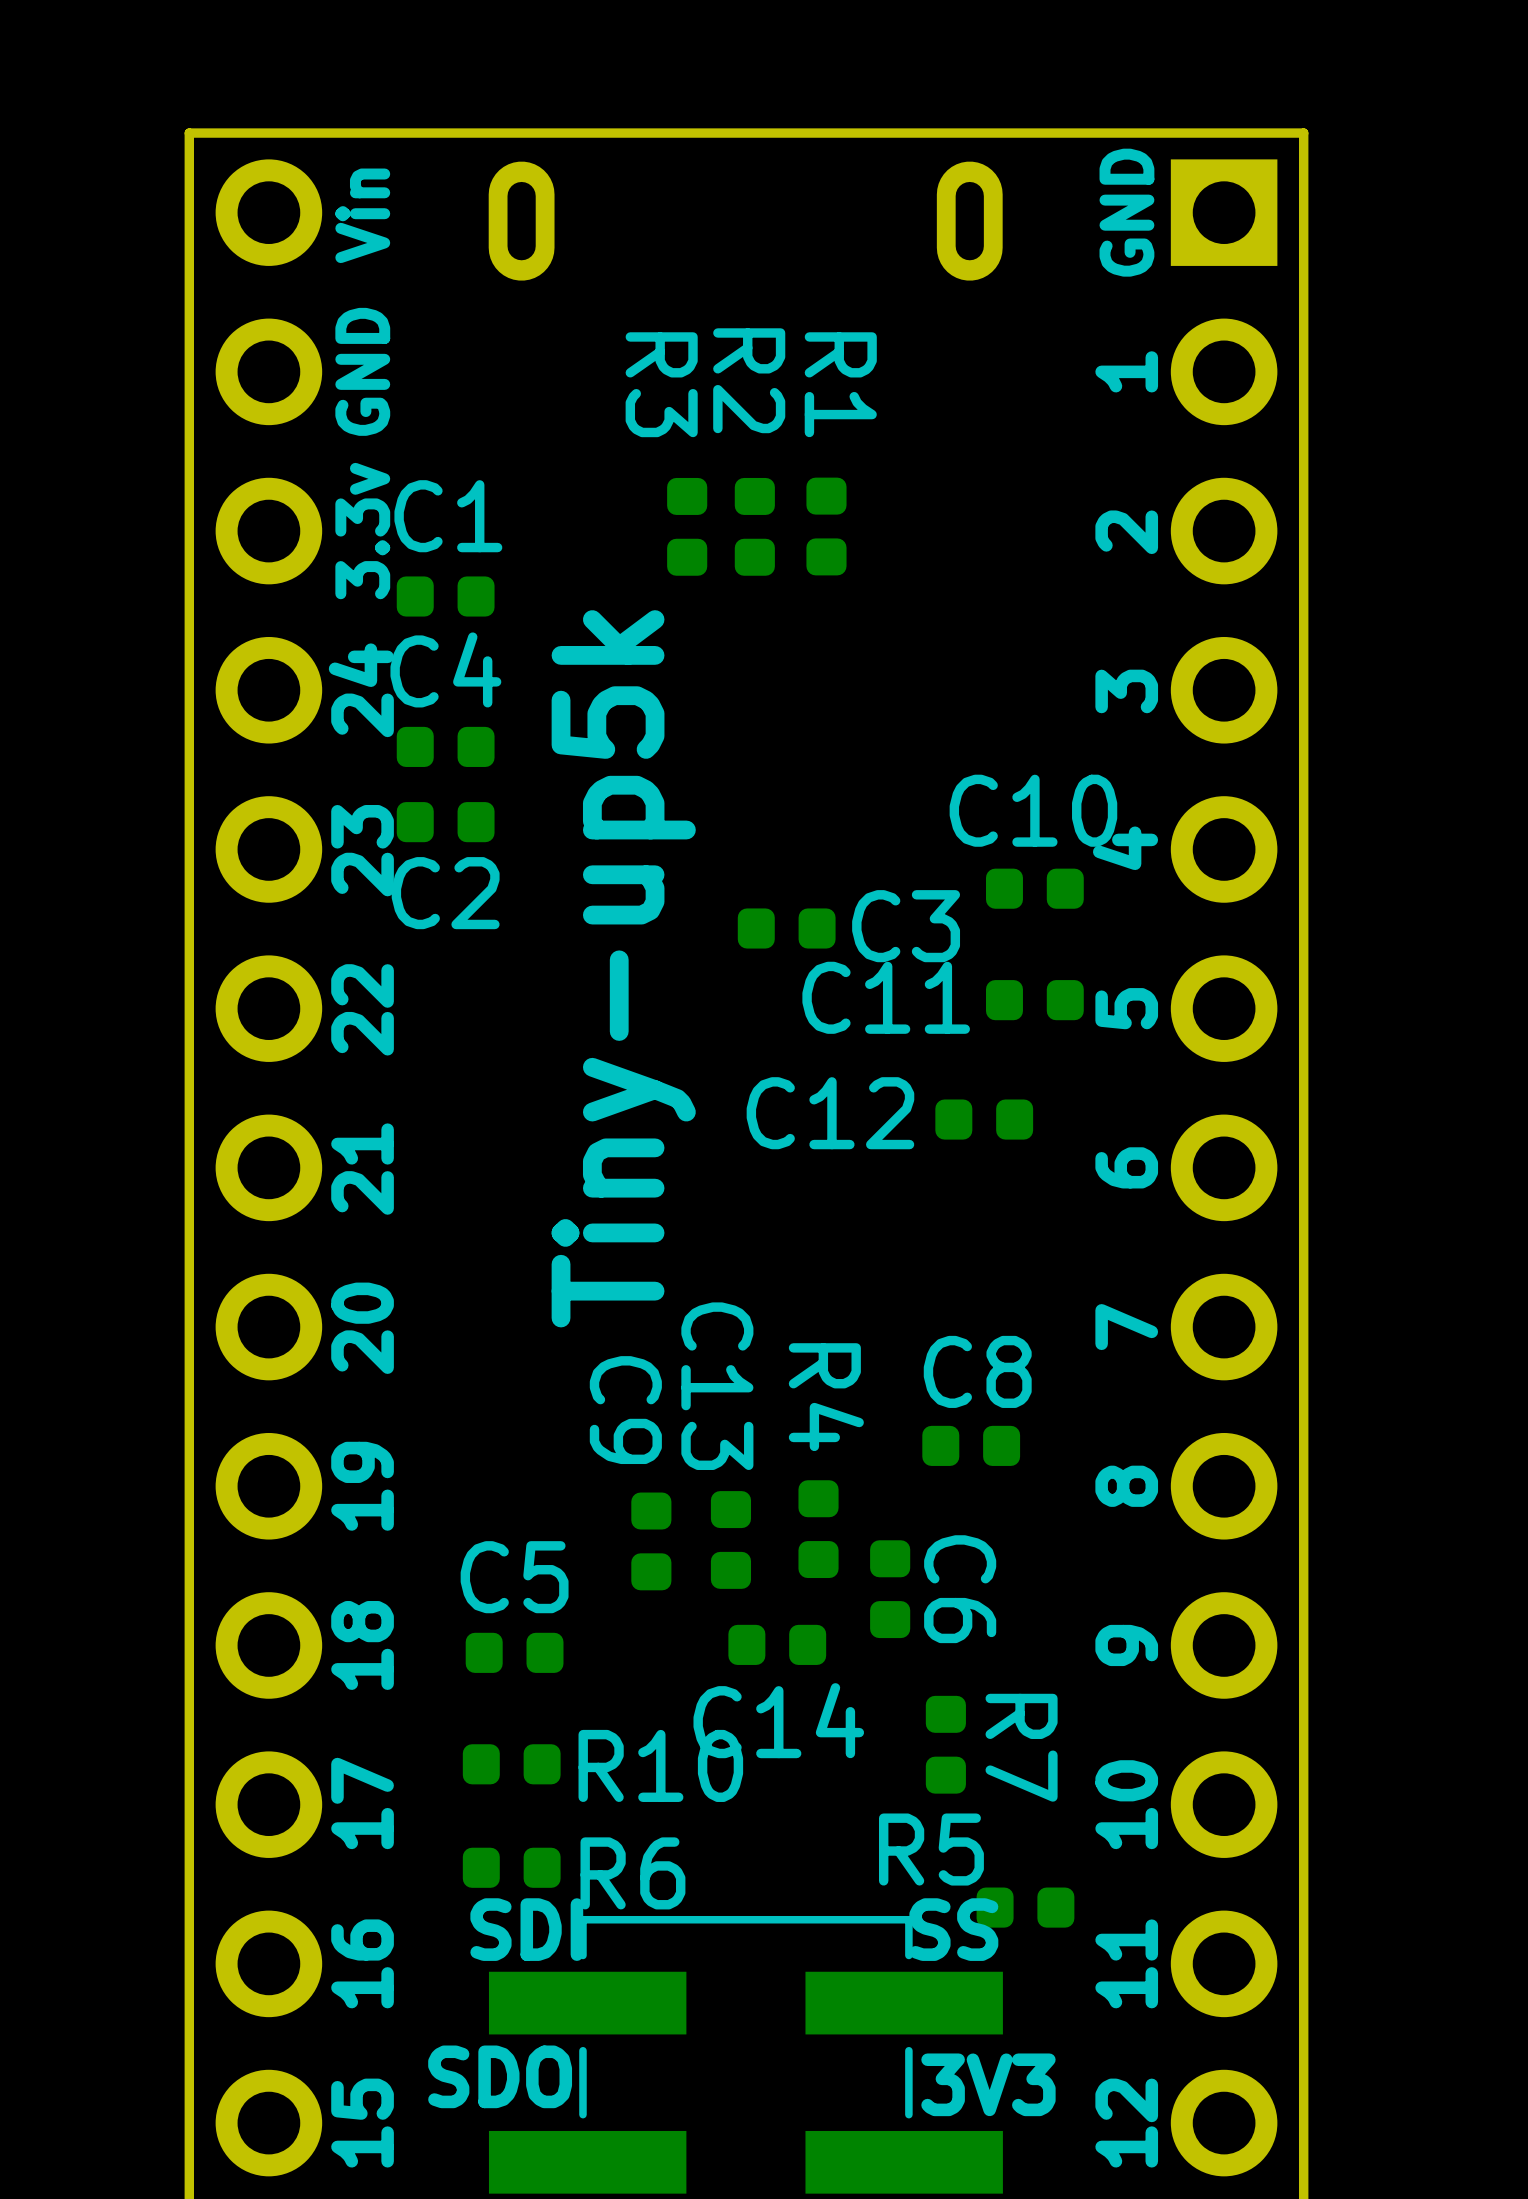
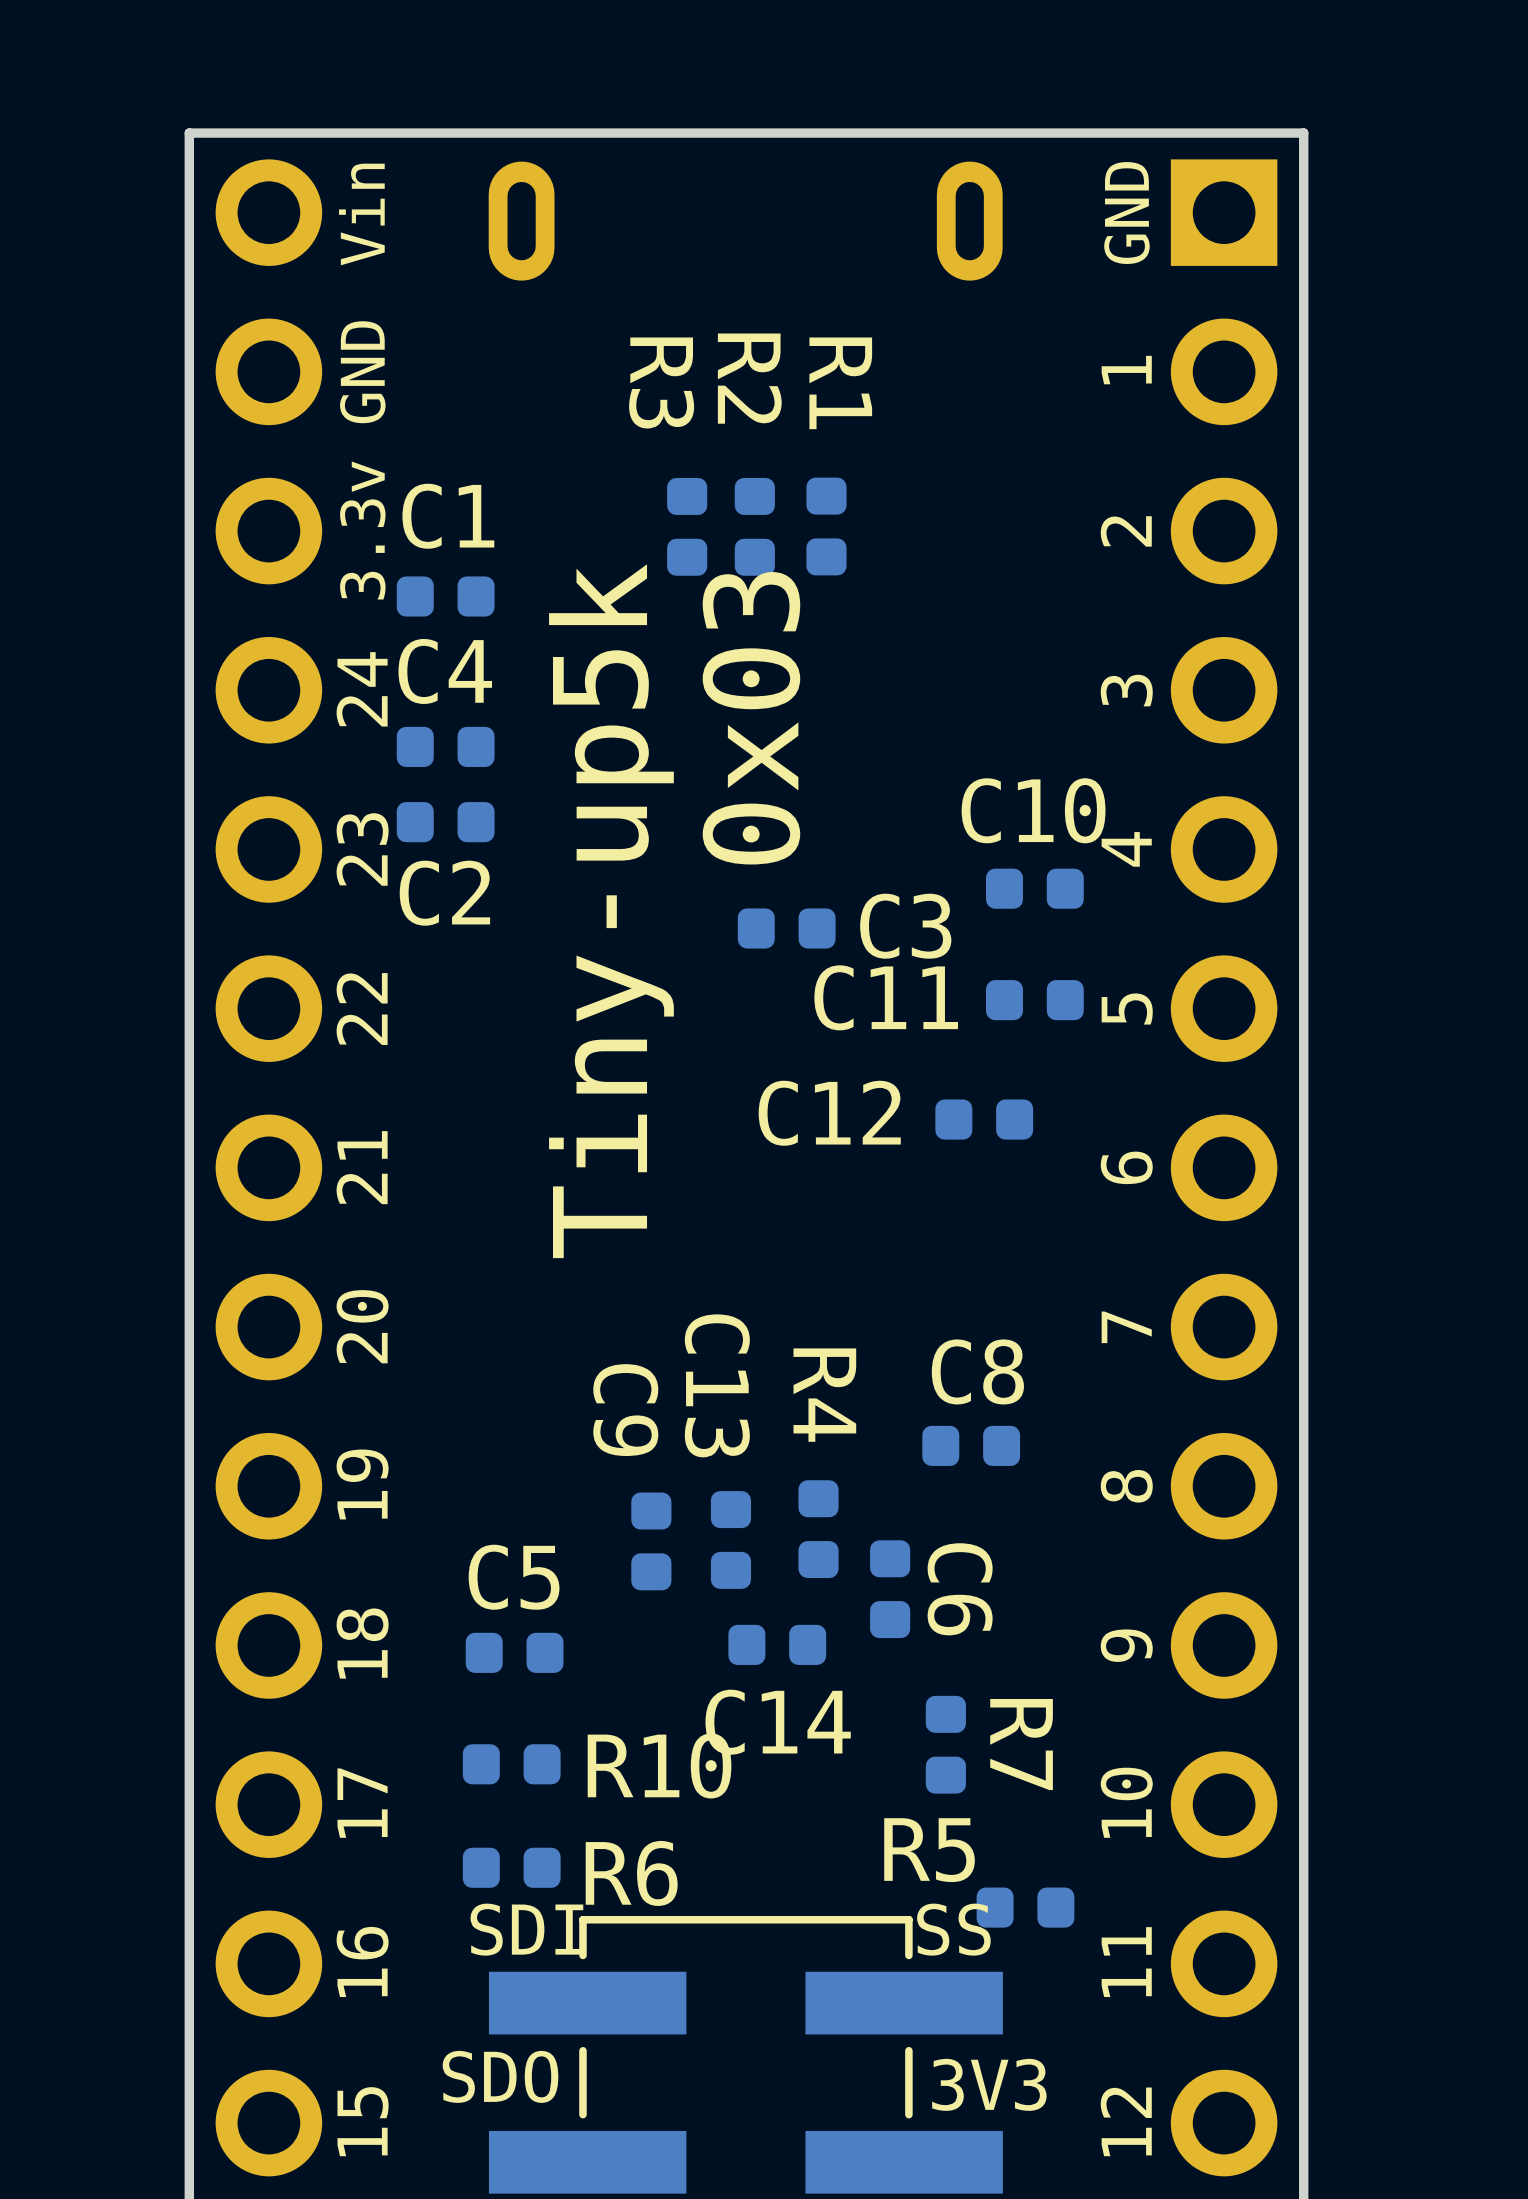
text: none -> 0x03 (751, 718)
text position: Tiny-up5k (623, 968) -> Tiny-up5k (611, 911)

